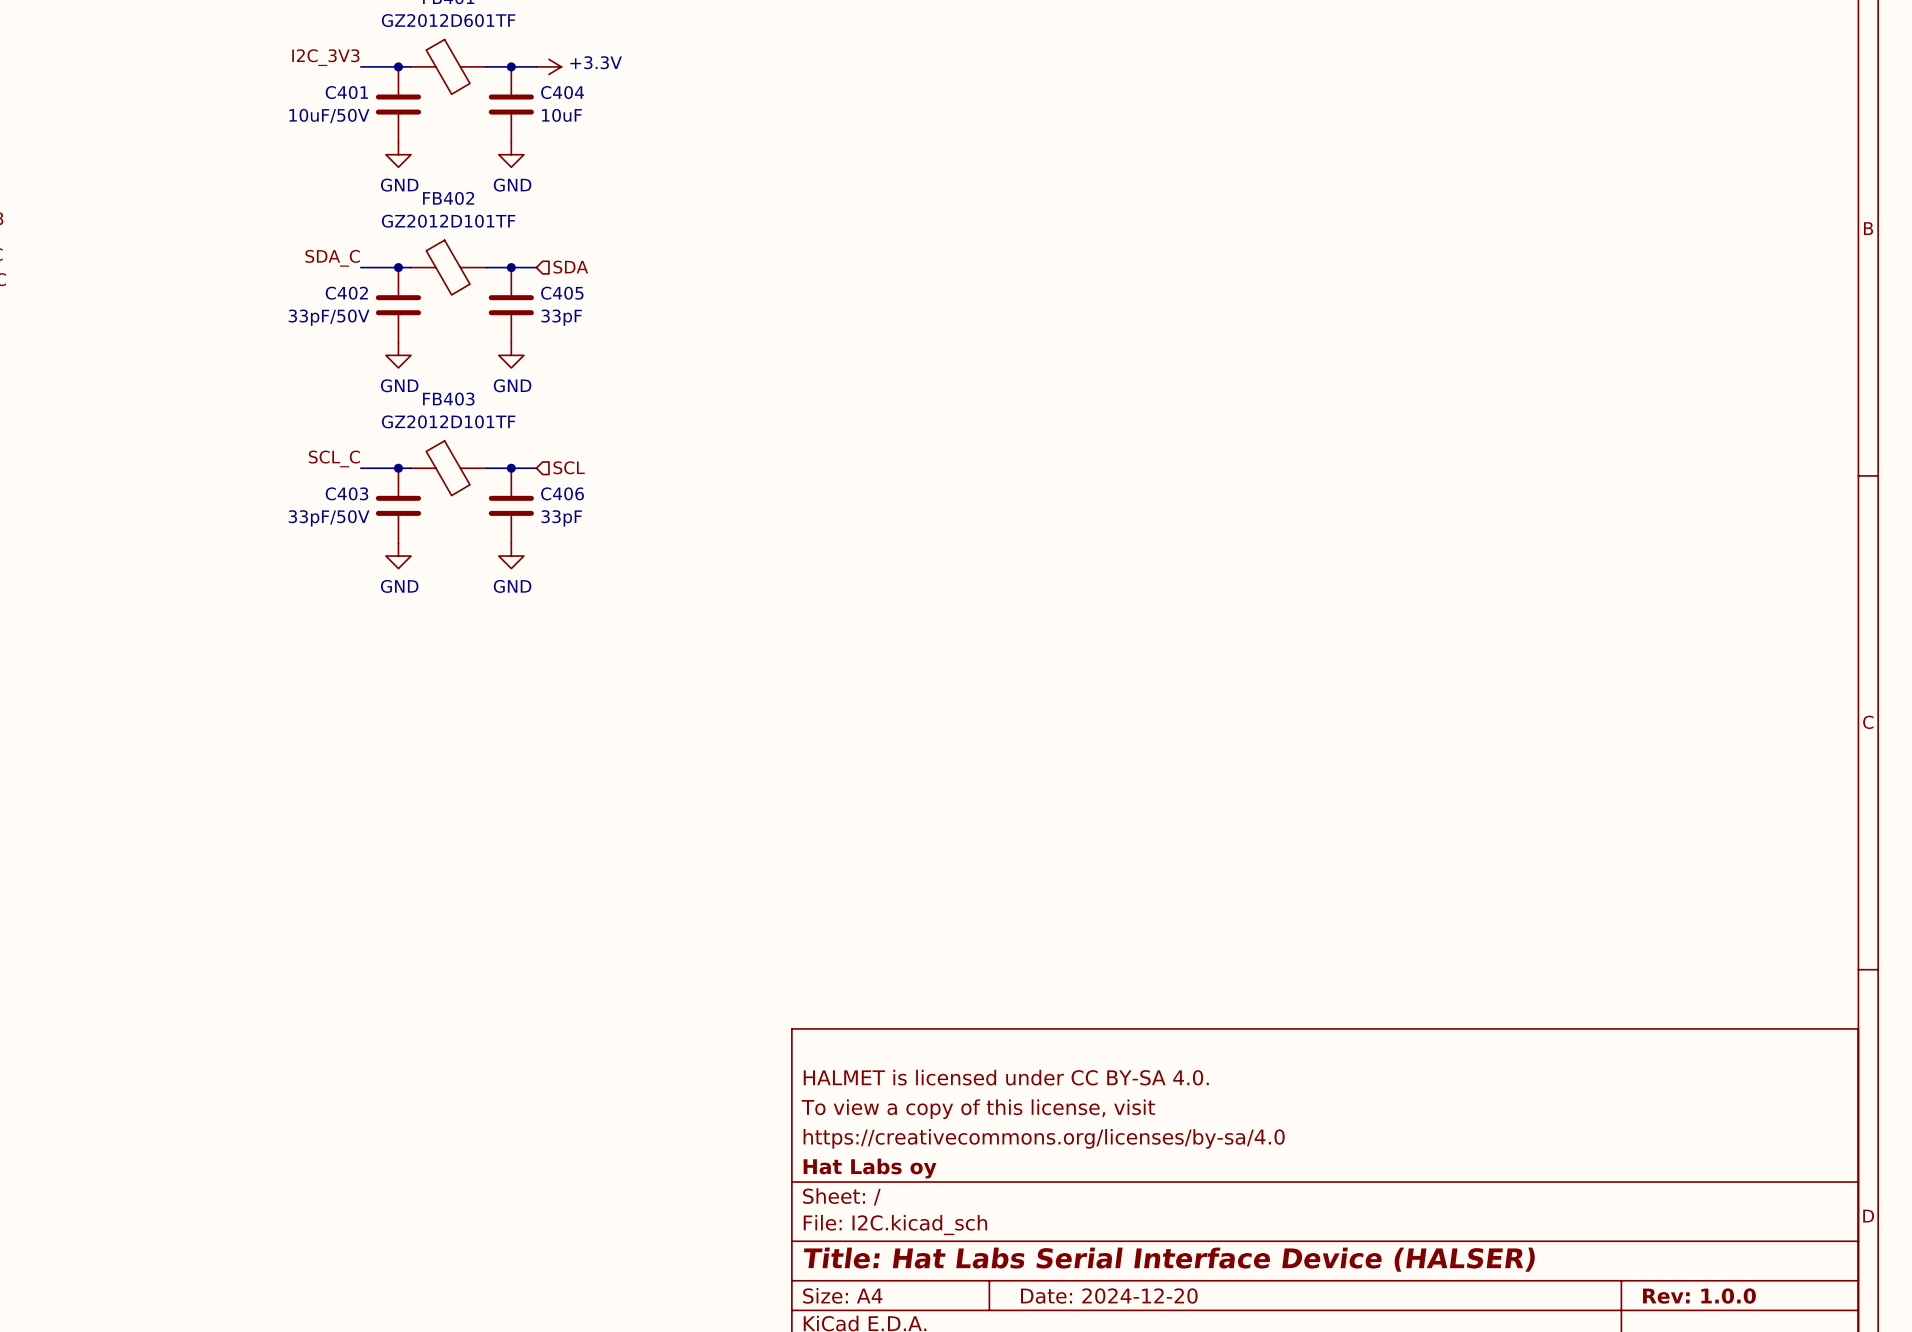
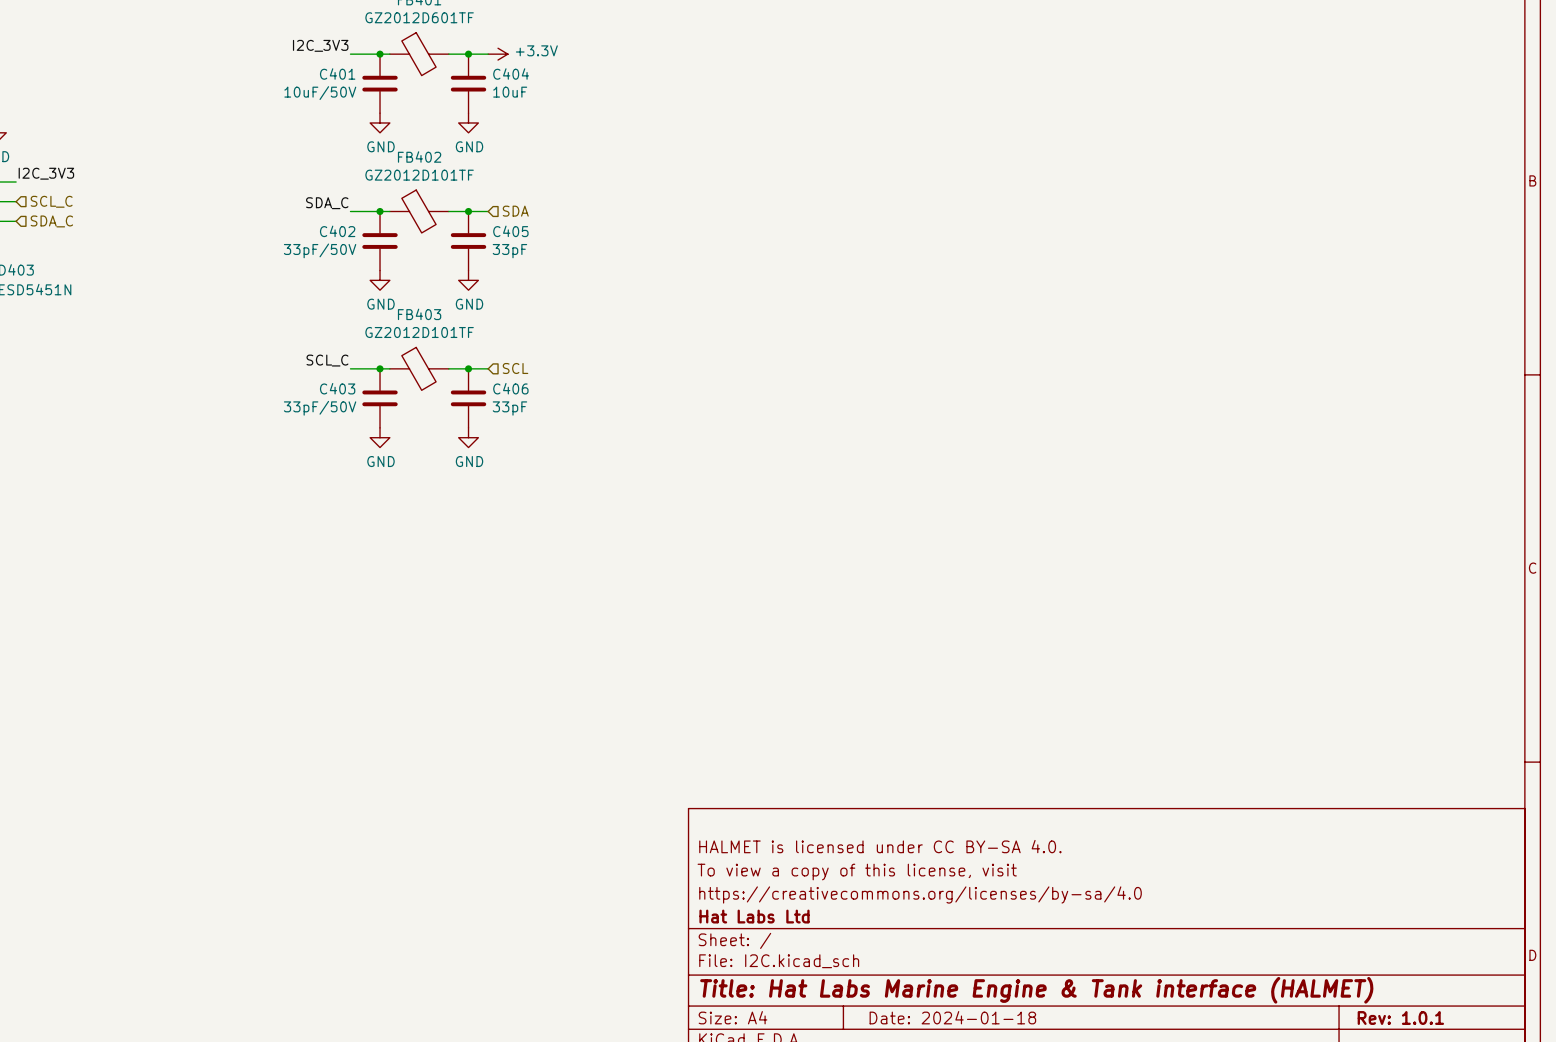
title block: Hat Labs oy (870, 1168) -> Hat Labs Ltd (754, 916)
title block: Title: Hat Labs Serial Interface Device (HALSER) (1169, 1259) -> Title: Hat Labs Marine Engine & Tank interface (HALMET) (1036, 990)
title block: Date: 2024-12-20 (1109, 1296) -> Date: 2024-01-18 (952, 1017)
title block: Rev: 1.0.0 (1699, 1296) -> Rev: 1.0.1 (1400, 1018)

